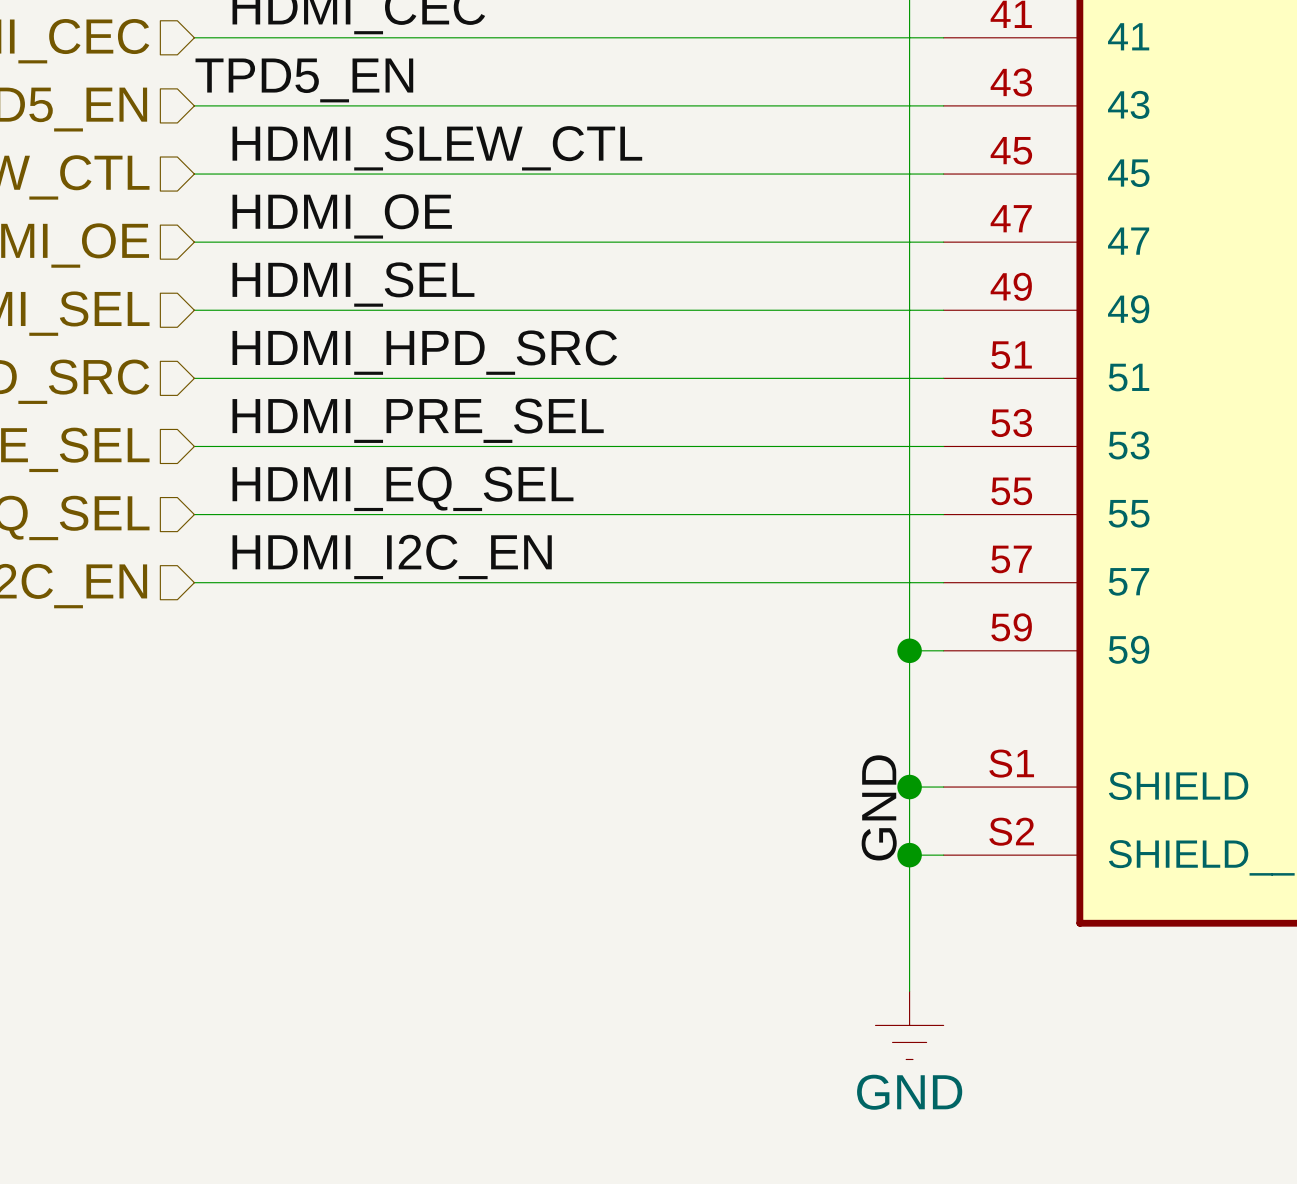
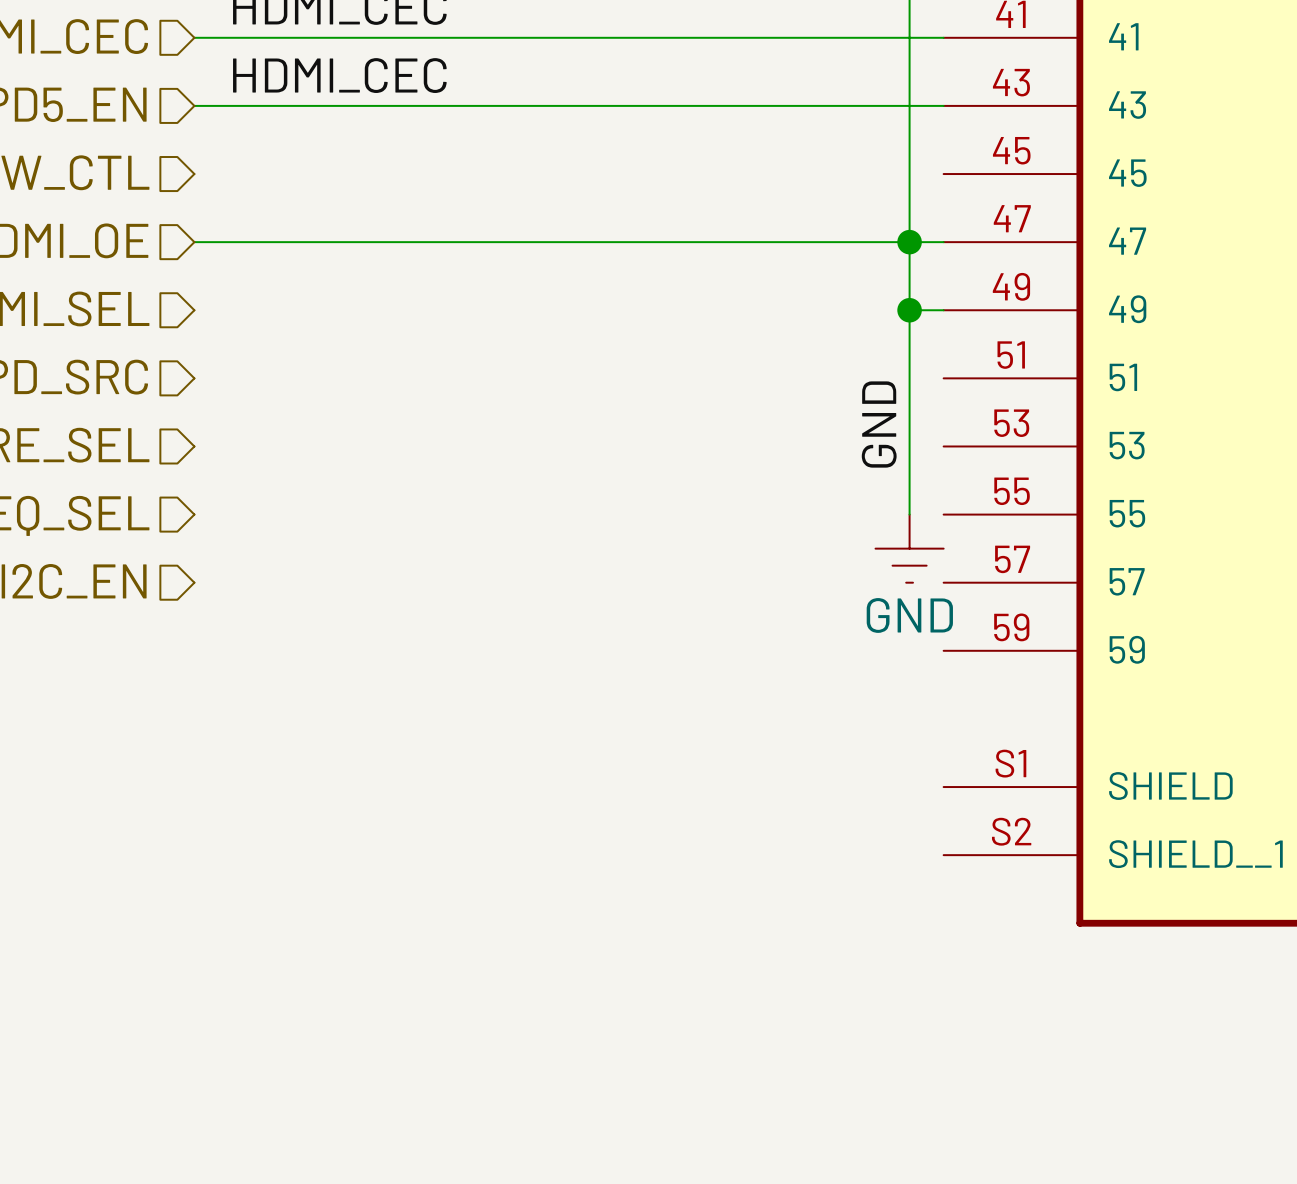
label: TPD5_EN (304, 80) -> none
label: HDMI_SLEW_CTL (437, 148) -> HDMI_CEC (339, 75)
wire: (194, 174) (943, 174) -> none
label: HDMI_OE (342, 216) -> none
junction: none -> (909, 242)
label: HDMI_SEL (353, 284) -> none
wire: (194, 310) (909, 310) -> none
junction: none -> (909, 310)
label: HDMI_HPD_SRC (424, 352) -> none
wire: (194, 378) (943, 378) -> none
label: HDMI_PRE_SEL (418, 420) -> none
wire: (194, 446) (943, 446) -> none
label: HDMI_EQ_SEL (402, 488) -> none
wire: (194, 514) (943, 514) -> none
wire: (909, 514) (909, 991) -> none
power symbol: none -> GND (909, 548)
label: HDMI_I2C_EN (392, 556) -> none
wire: (194, 582) (943, 582) -> none
wire: (909, 650) (943, 650) -> none
junction: (909, 650) -> none
wire: (909, 787) (943, 787) -> none
junction: (909, 787) -> none
label position: GND (879, 807) -> GND (879, 424)
wire: (909, 855) (943, 855) -> none
junction: (909, 855) -> none
power symbol: GND (909, 1025) -> none

